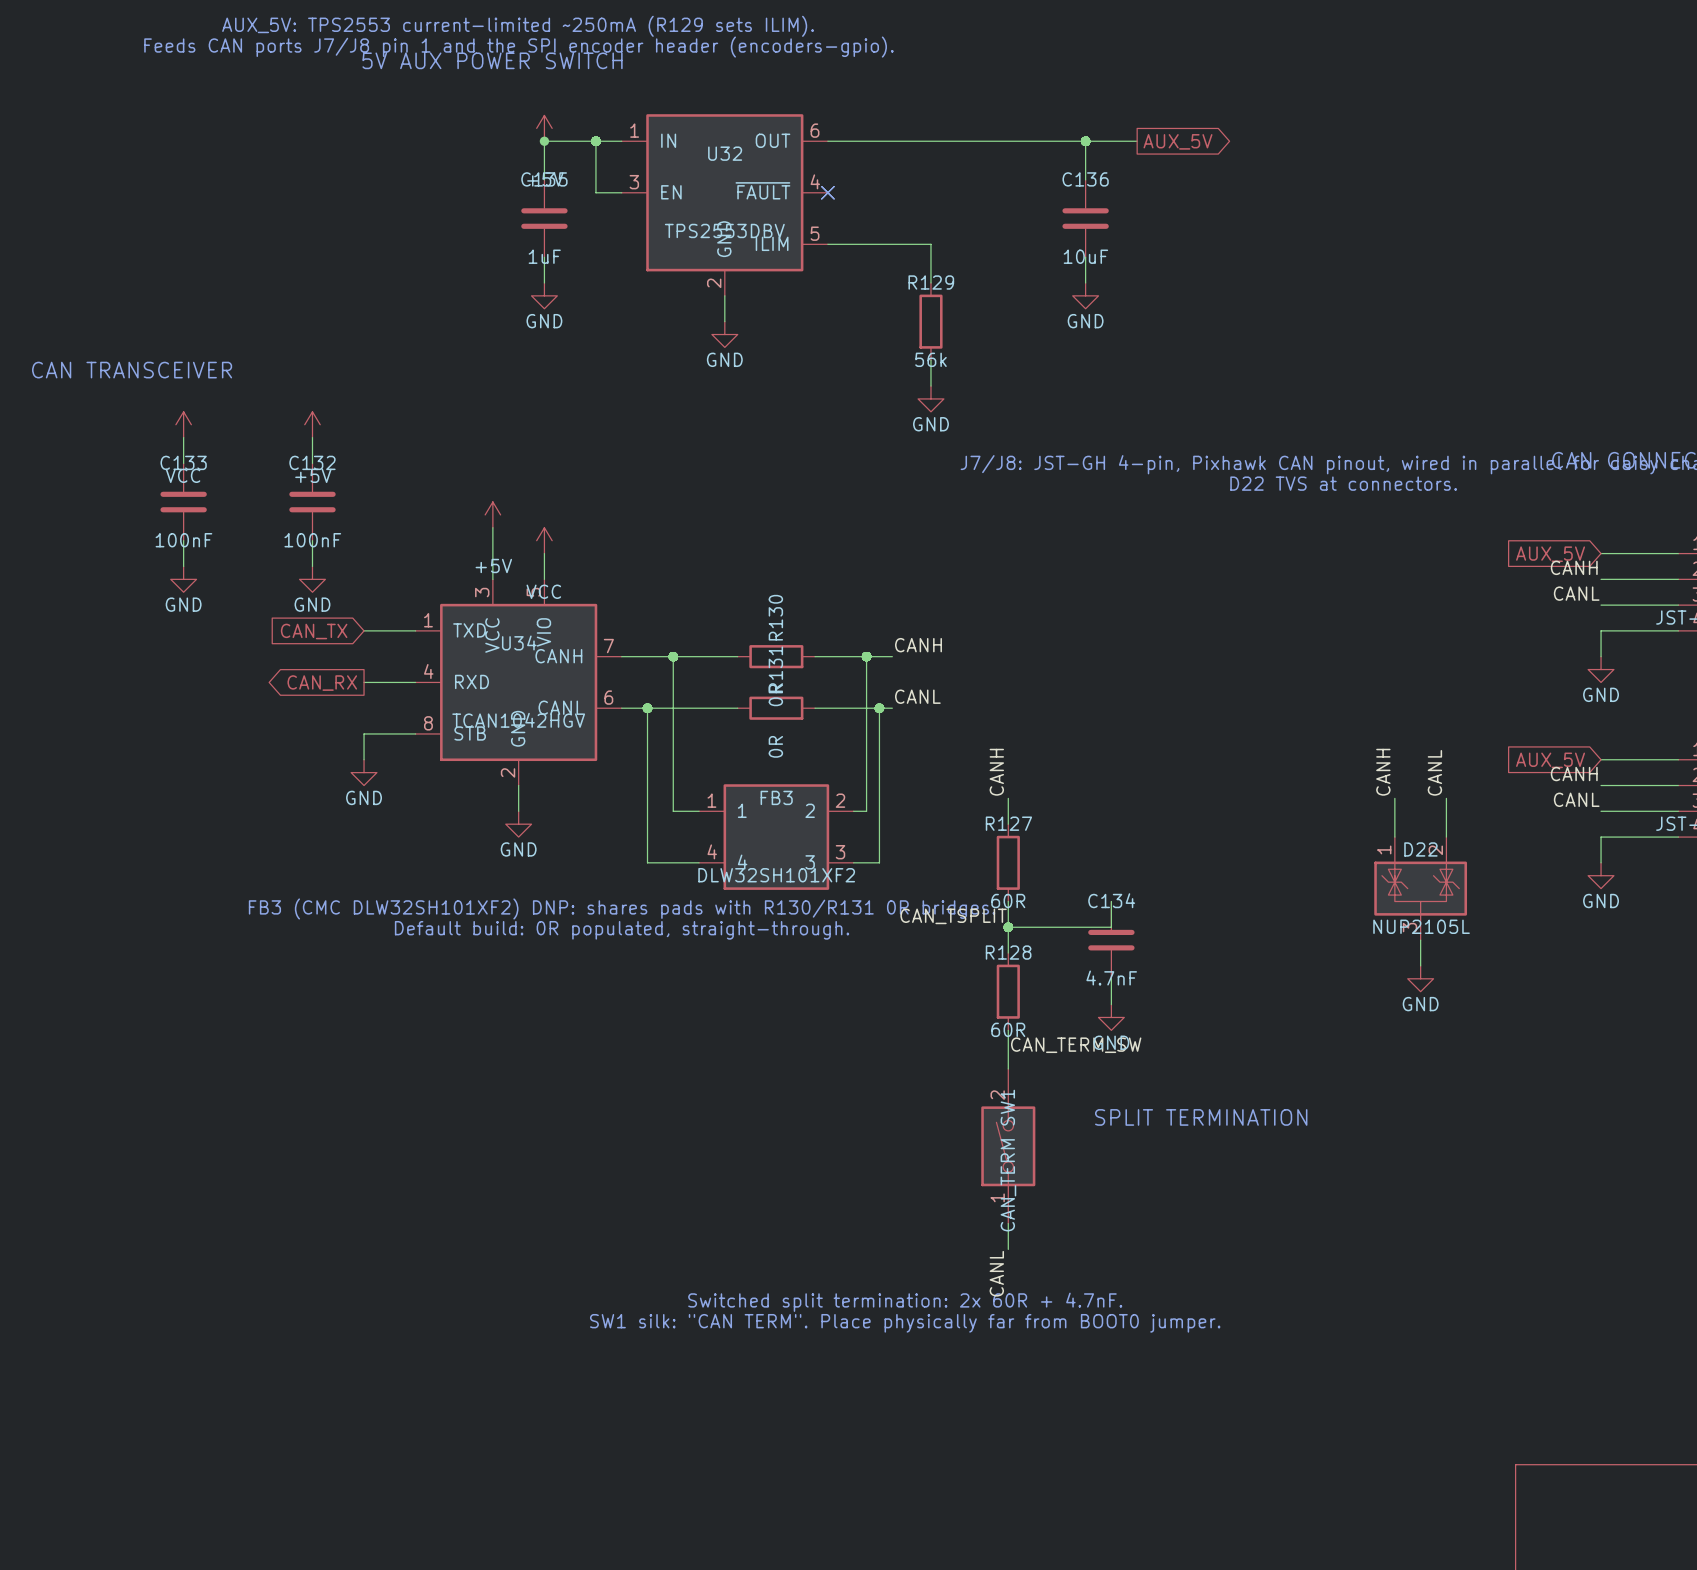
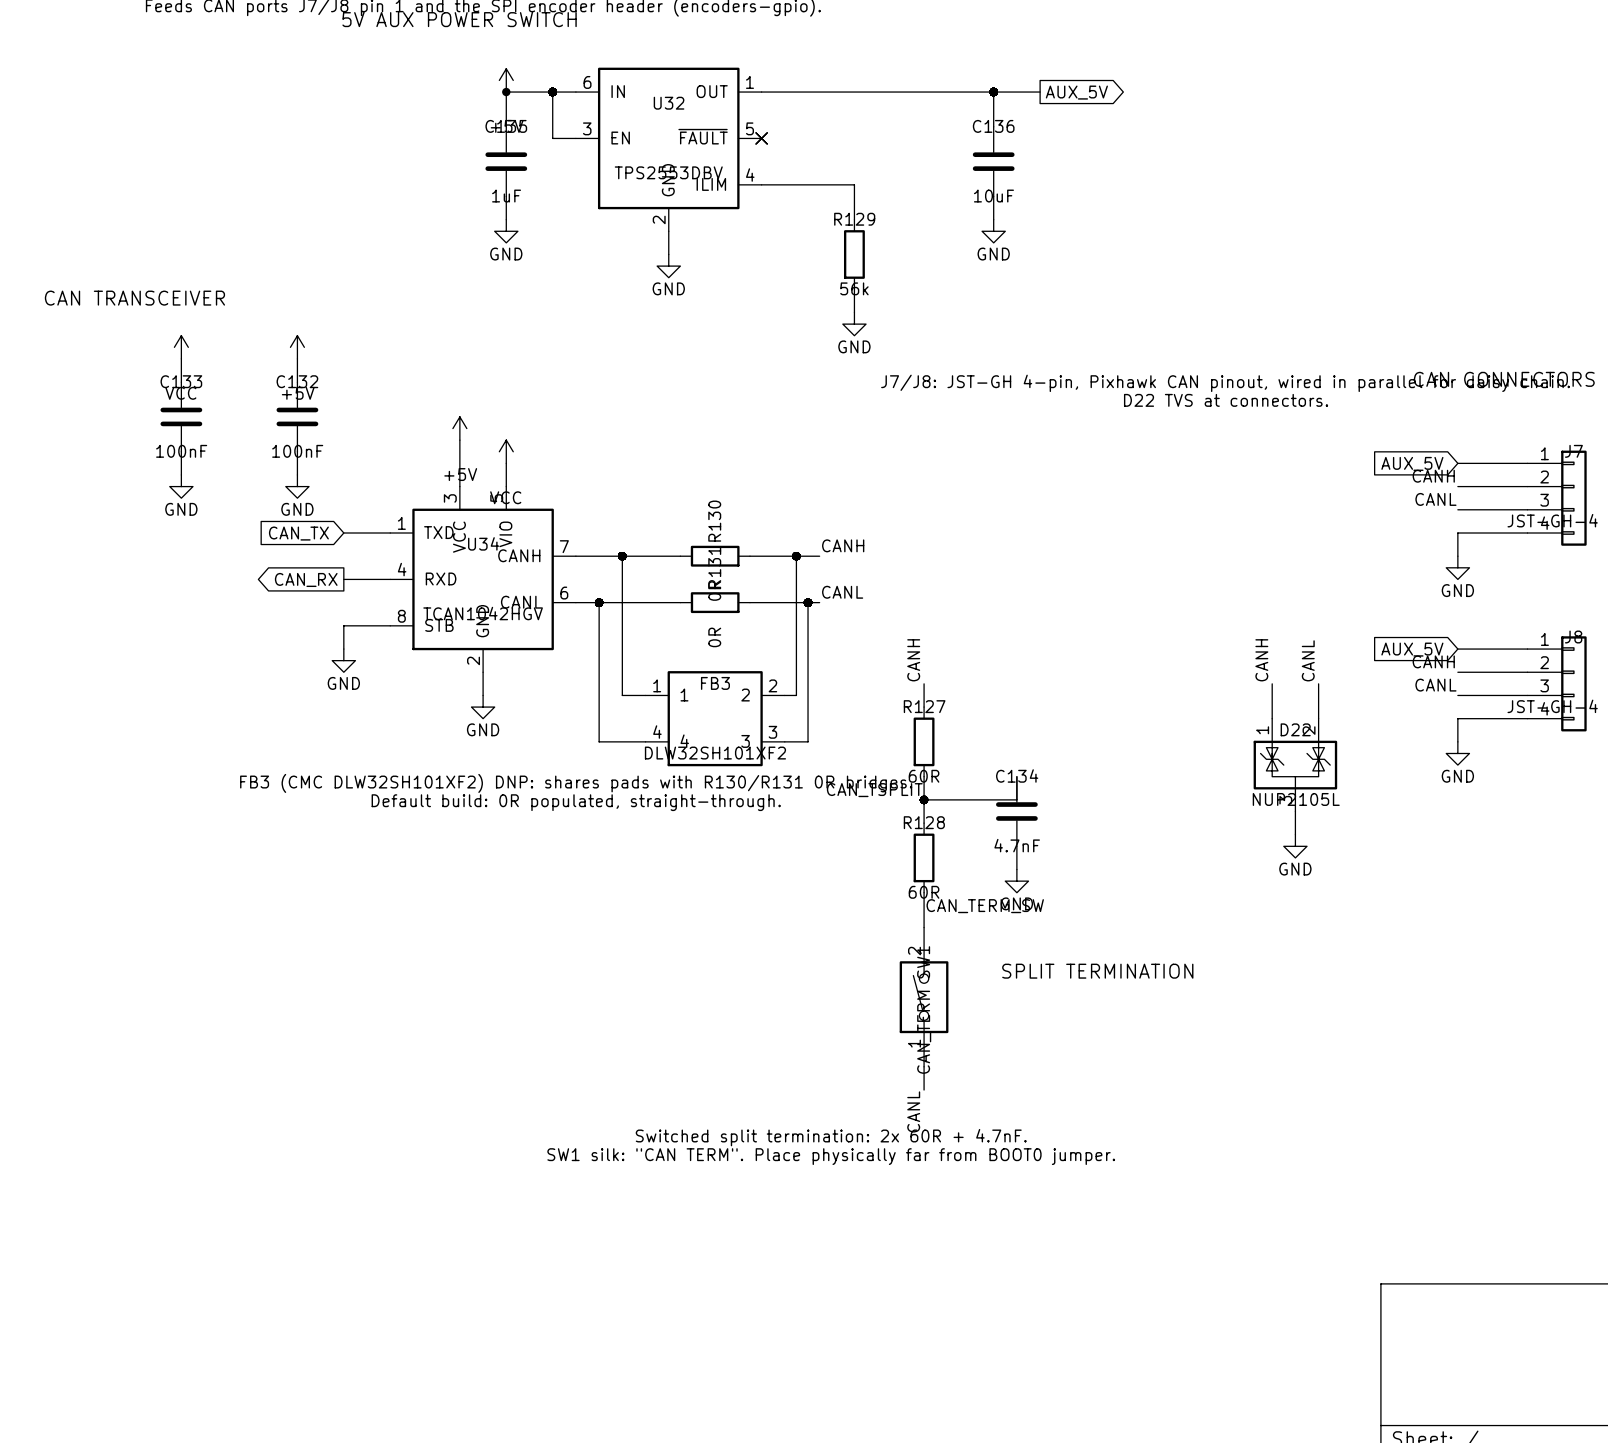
U32 pin number: 1 (634, 130) -> 6 (587, 82)
U32 pin number: 6 (815, 130) -> 1 (749, 82)
U32 pin number: 4 (815, 181) -> 5 (749, 128)
U32 pin number: 5 (815, 233) -> 4 (750, 175)

